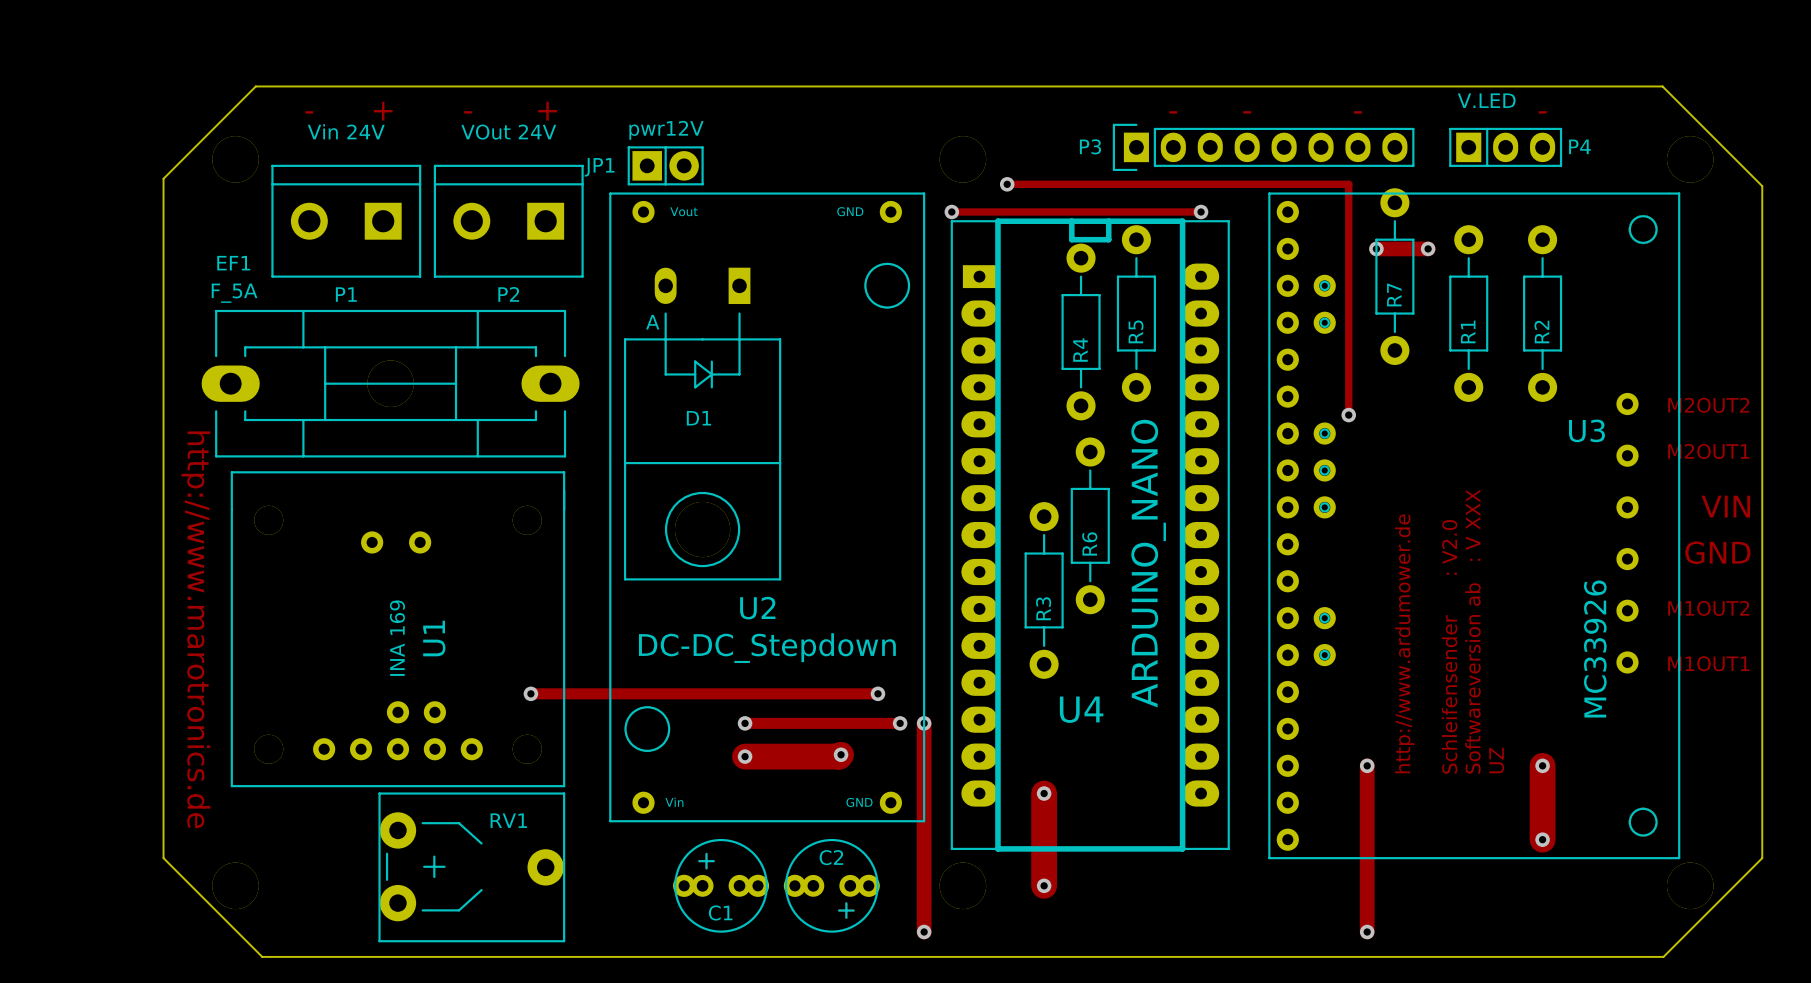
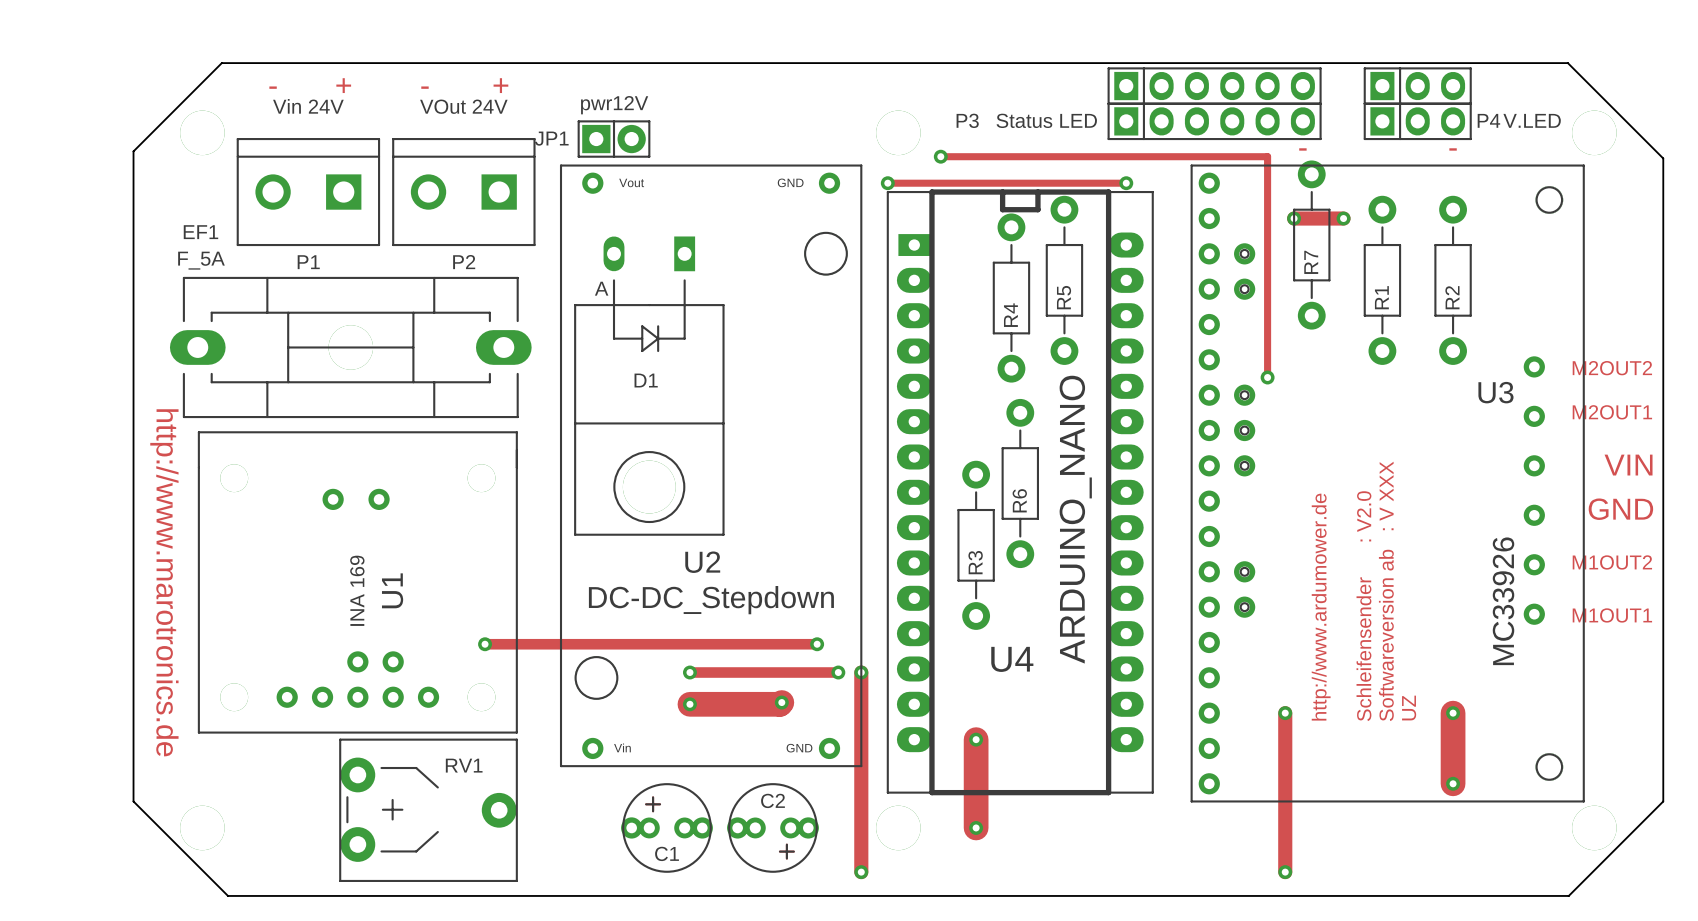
P4 value position: V.LED (1486, 100) -> V.LED (1532, 120)
part: none -> (1214, 86)
part: none -> (1417, 86)
text: - (1173, 112) -> none
text: - (1247, 112) -> none
text position: - (1357, 112) -> - (1302, 149)
text position: - (1542, 112) -> - (1453, 149)
P3 footprint: [1112, 123, 1415, 172] -> [1107, 102, 1322, 141]
P3 name position: P3 (1090, 146) -> P3 (967, 120)
P3 value: none -> Status LED (1046, 120)

